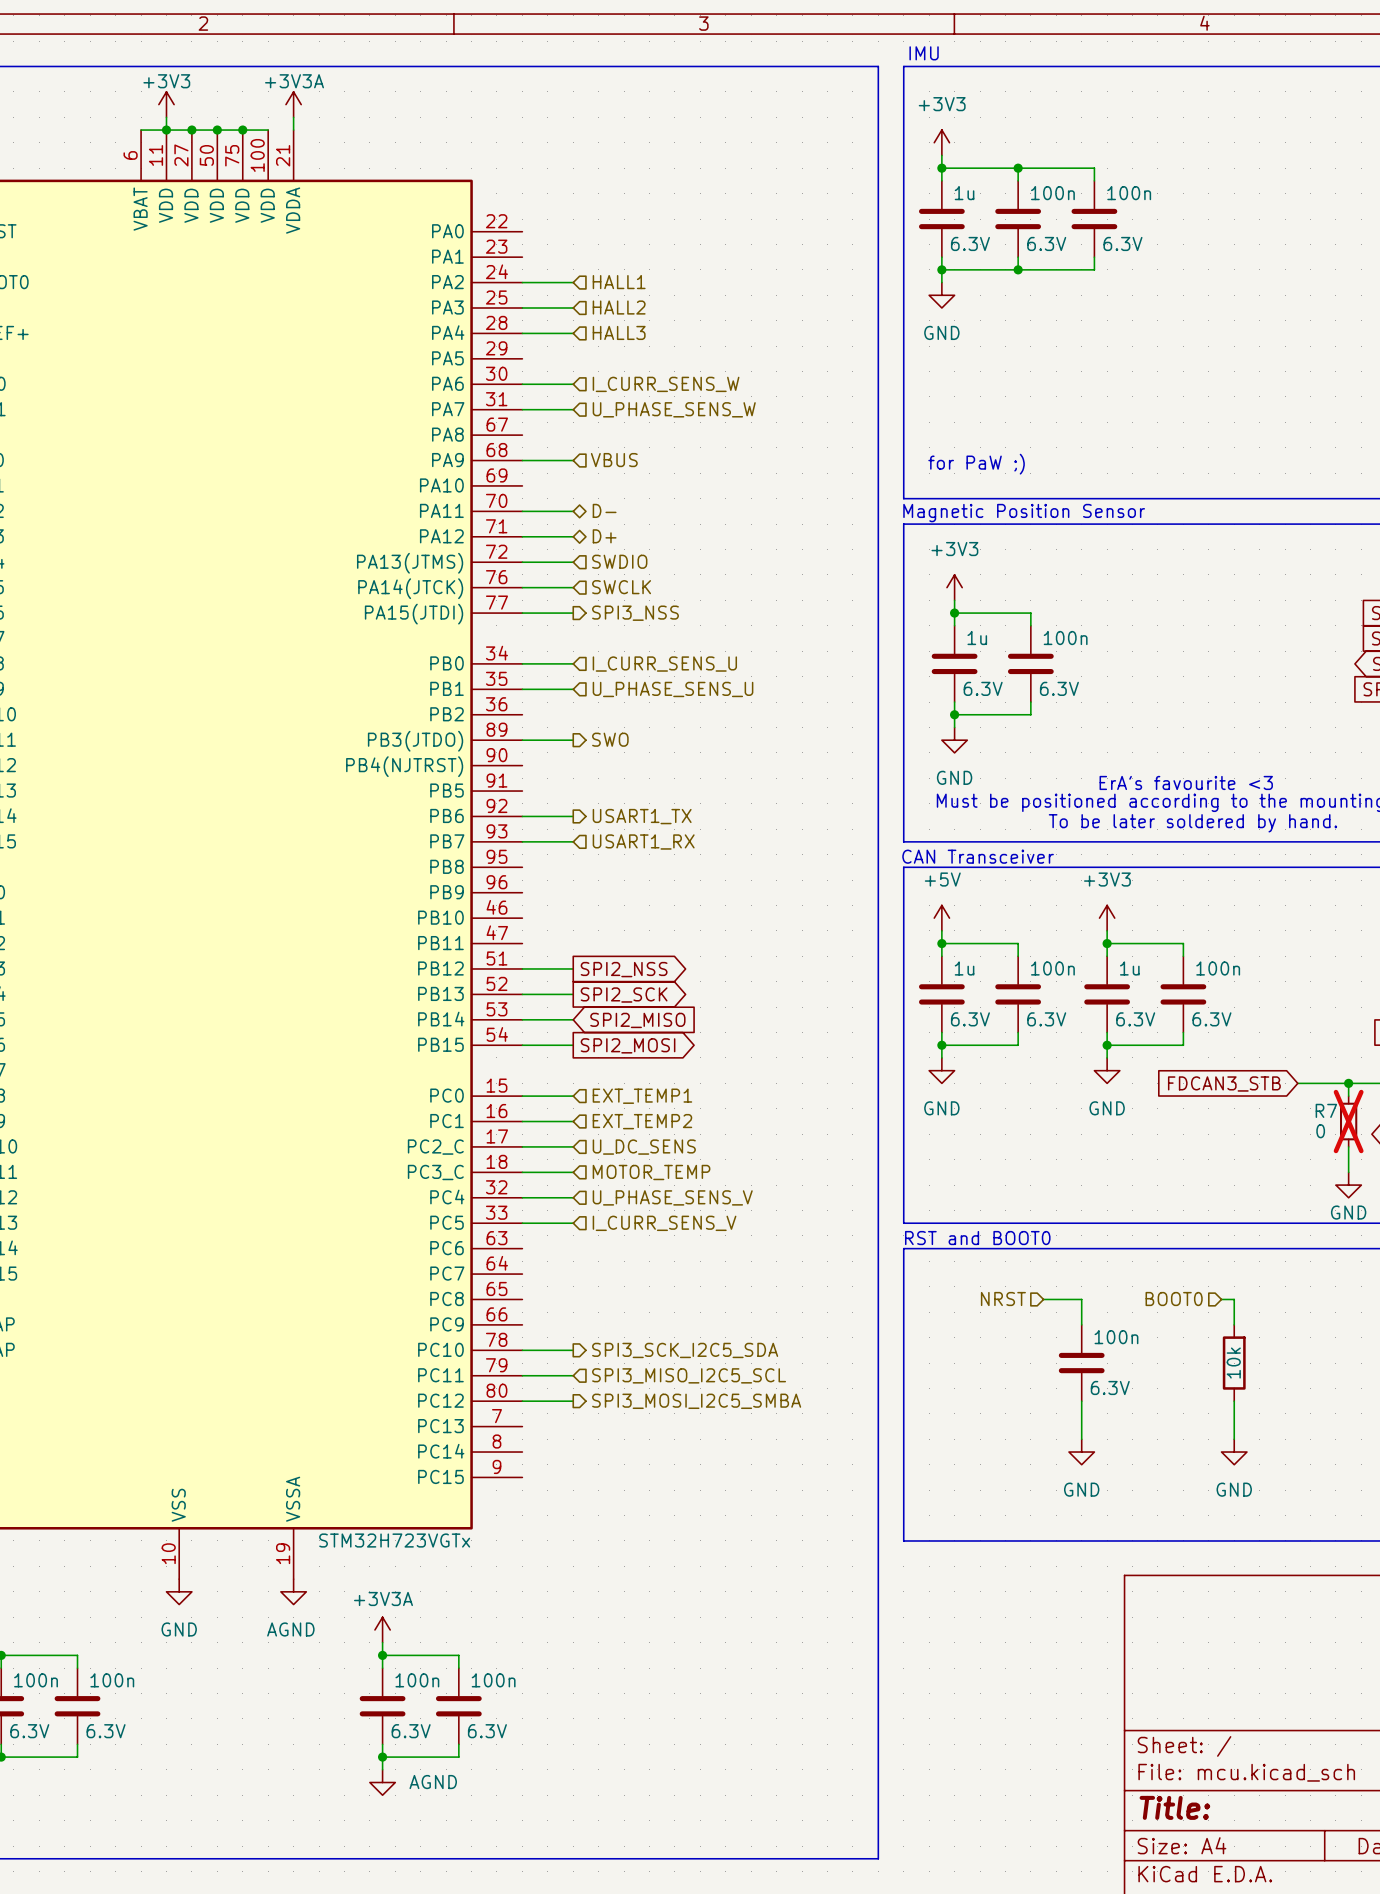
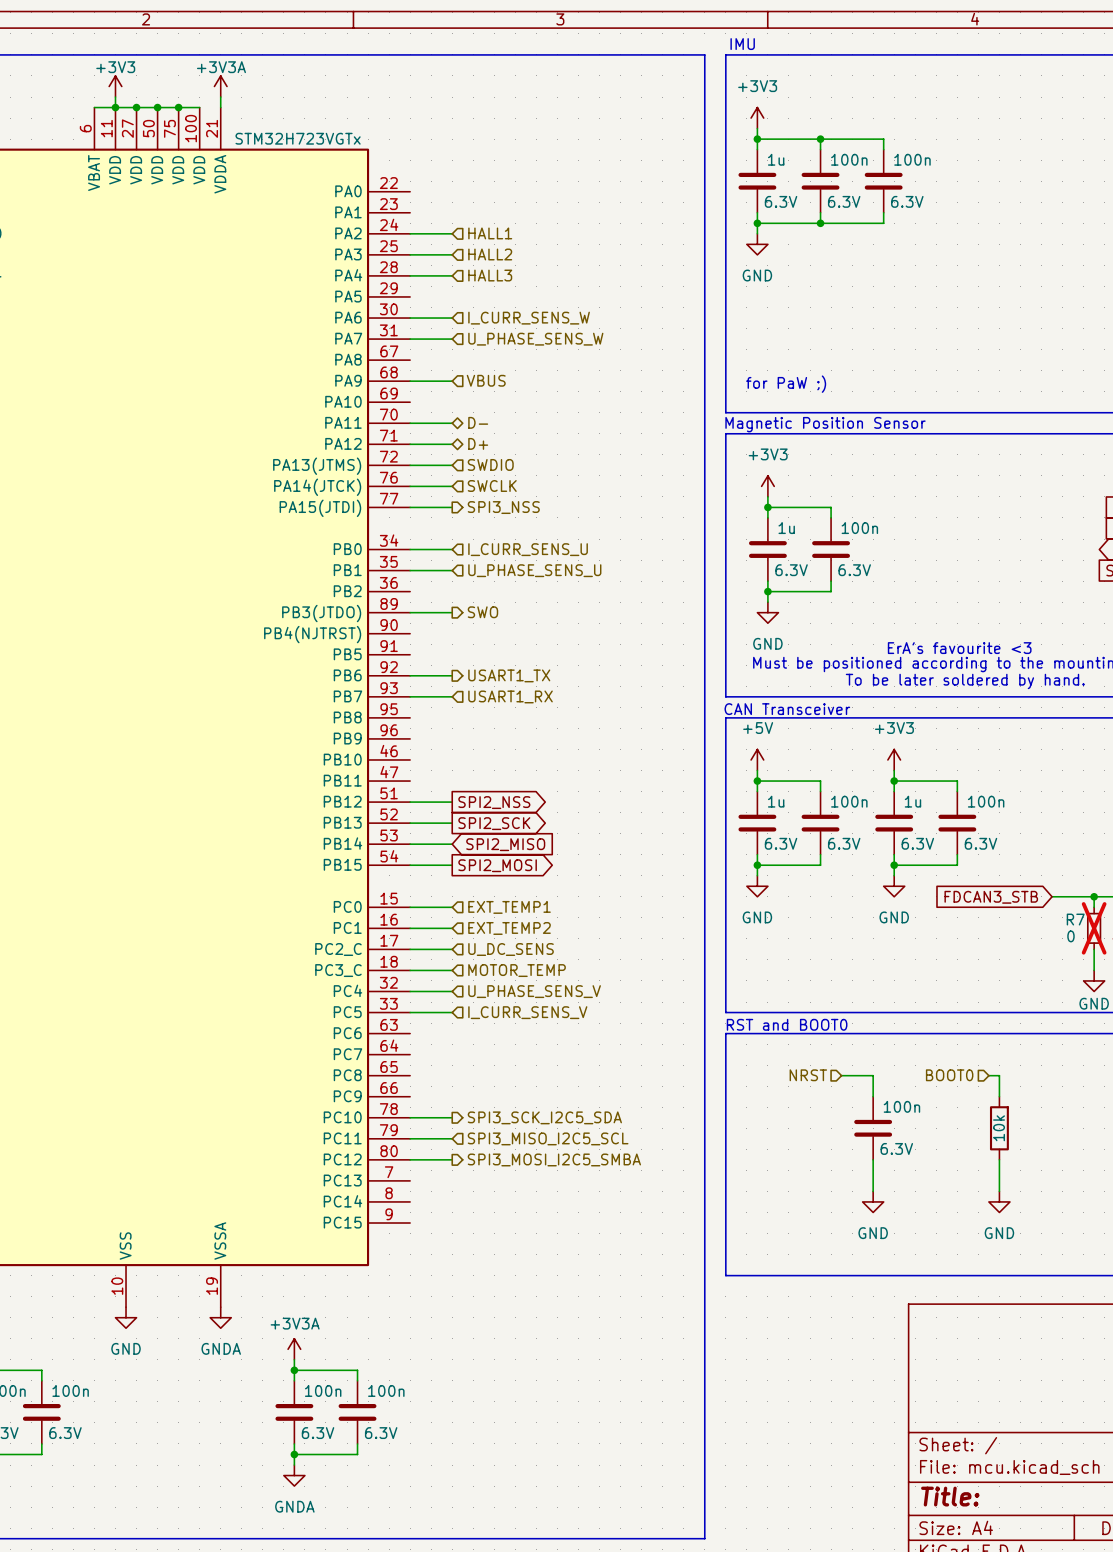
part value position: STM32H723VGTx (394, 1540) -> STM32H723VGTx (298, 138)
power symbol: AGND (293, 1591) -> GNDA (220, 1317)
power symbol: AGND (382, 1782) -> GNDA (294, 1475)

